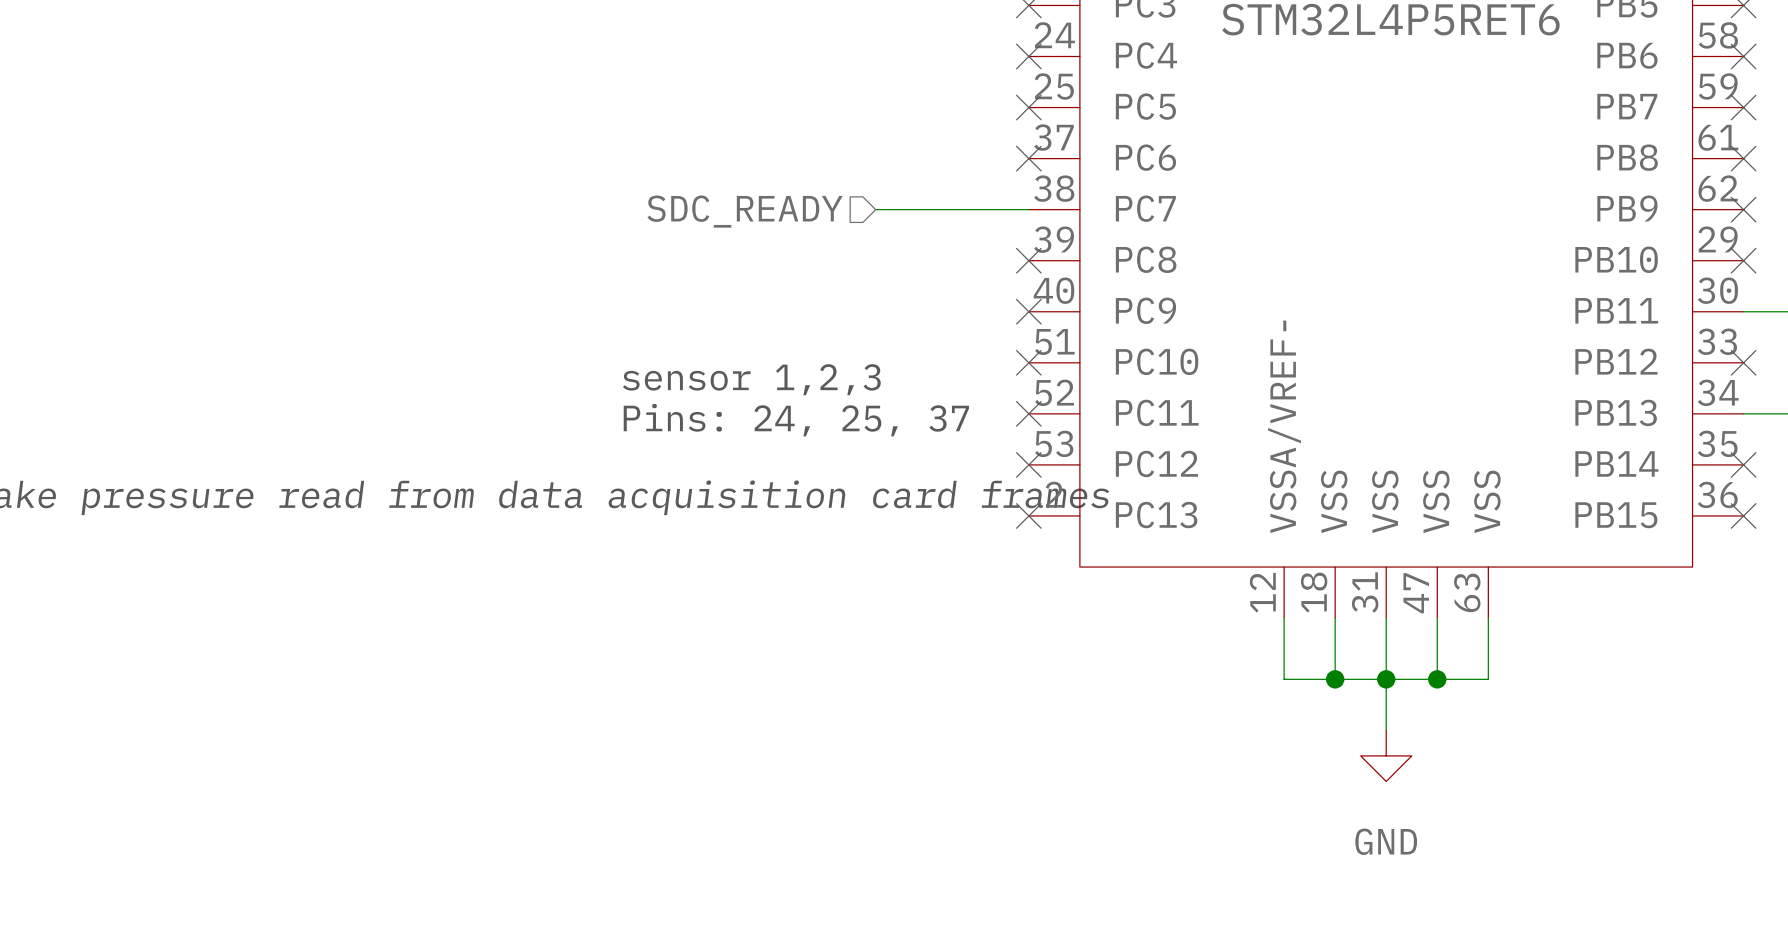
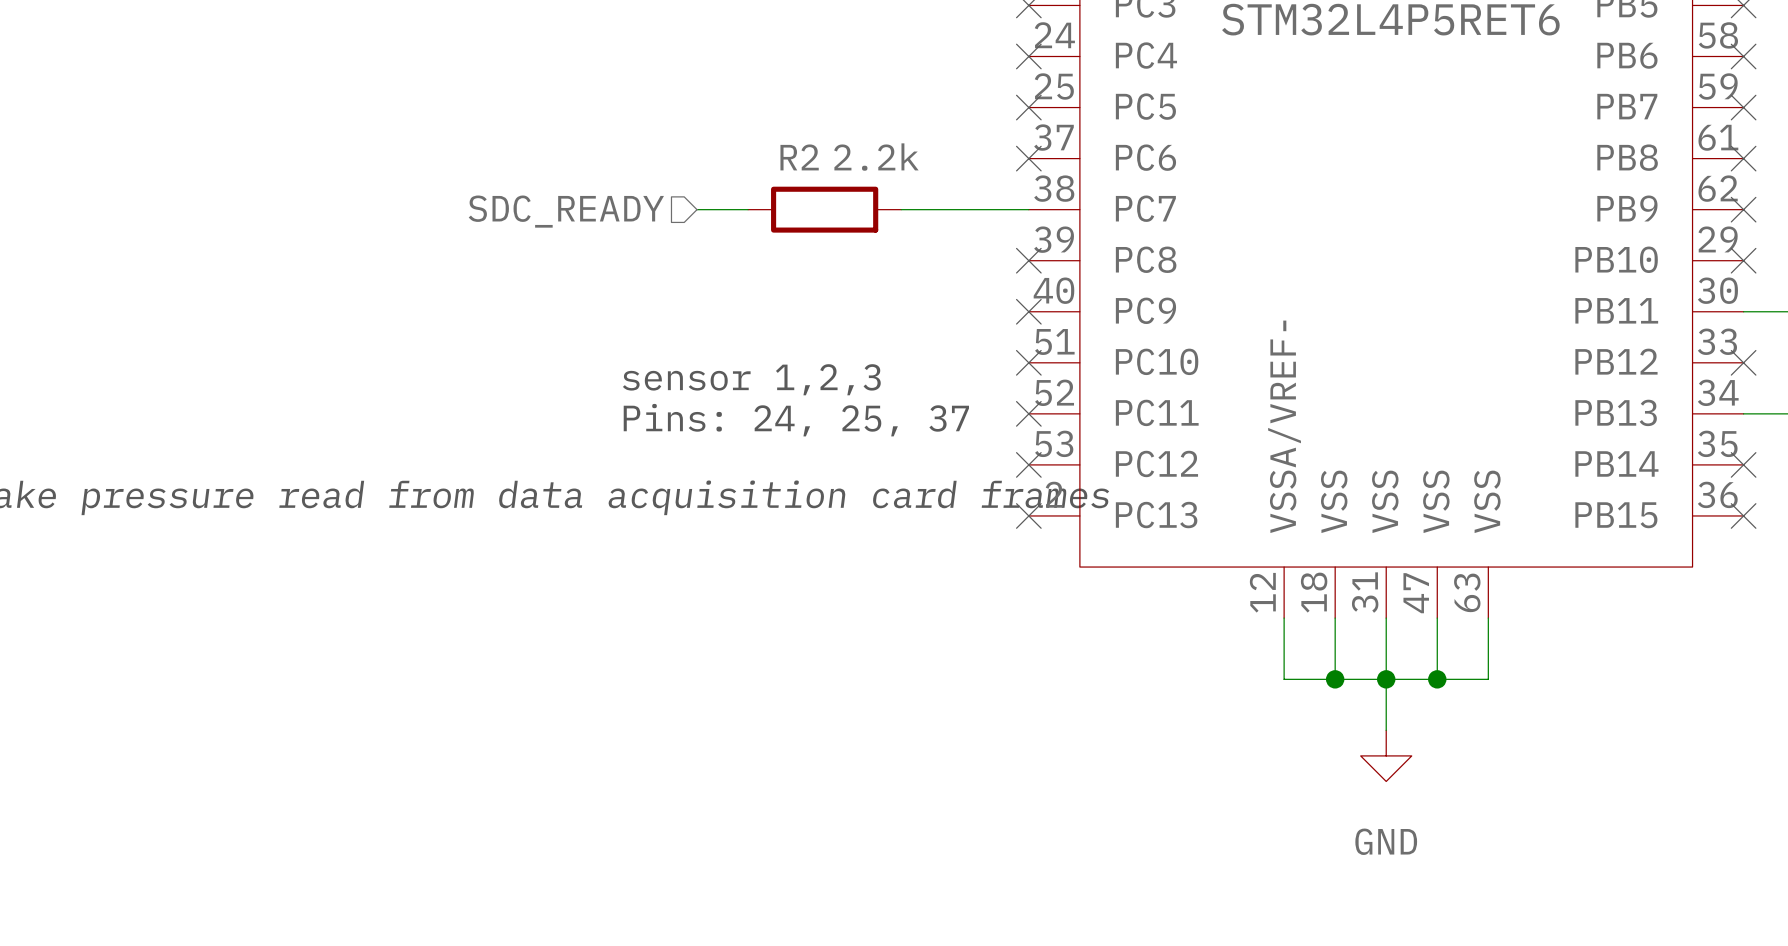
wire: none -> (697, 209) (748, 209)
R2: none -> 2.2k (824, 209)
hierarchical label position: SDC_READY (745, 211) -> SDC_READY (566, 211)

